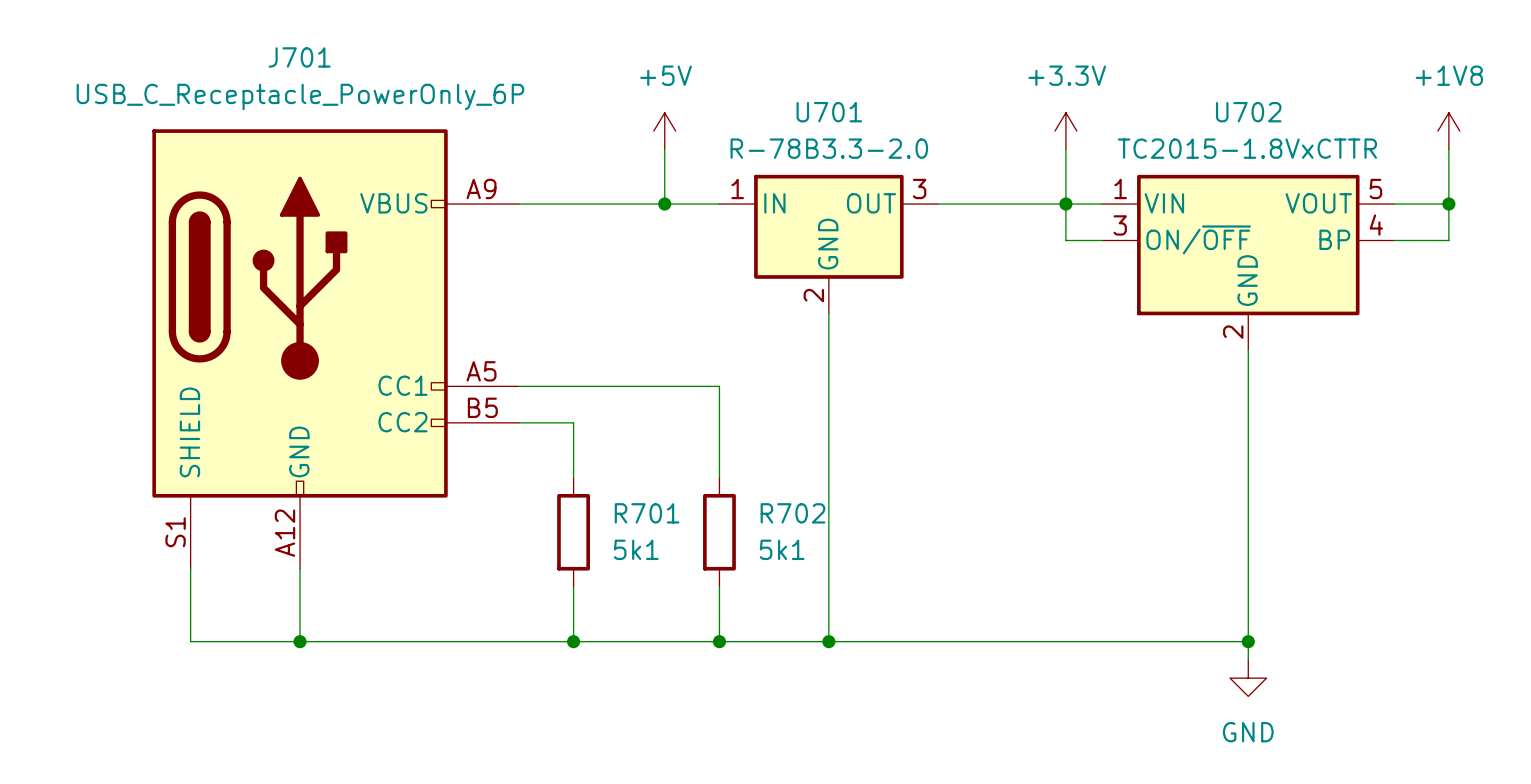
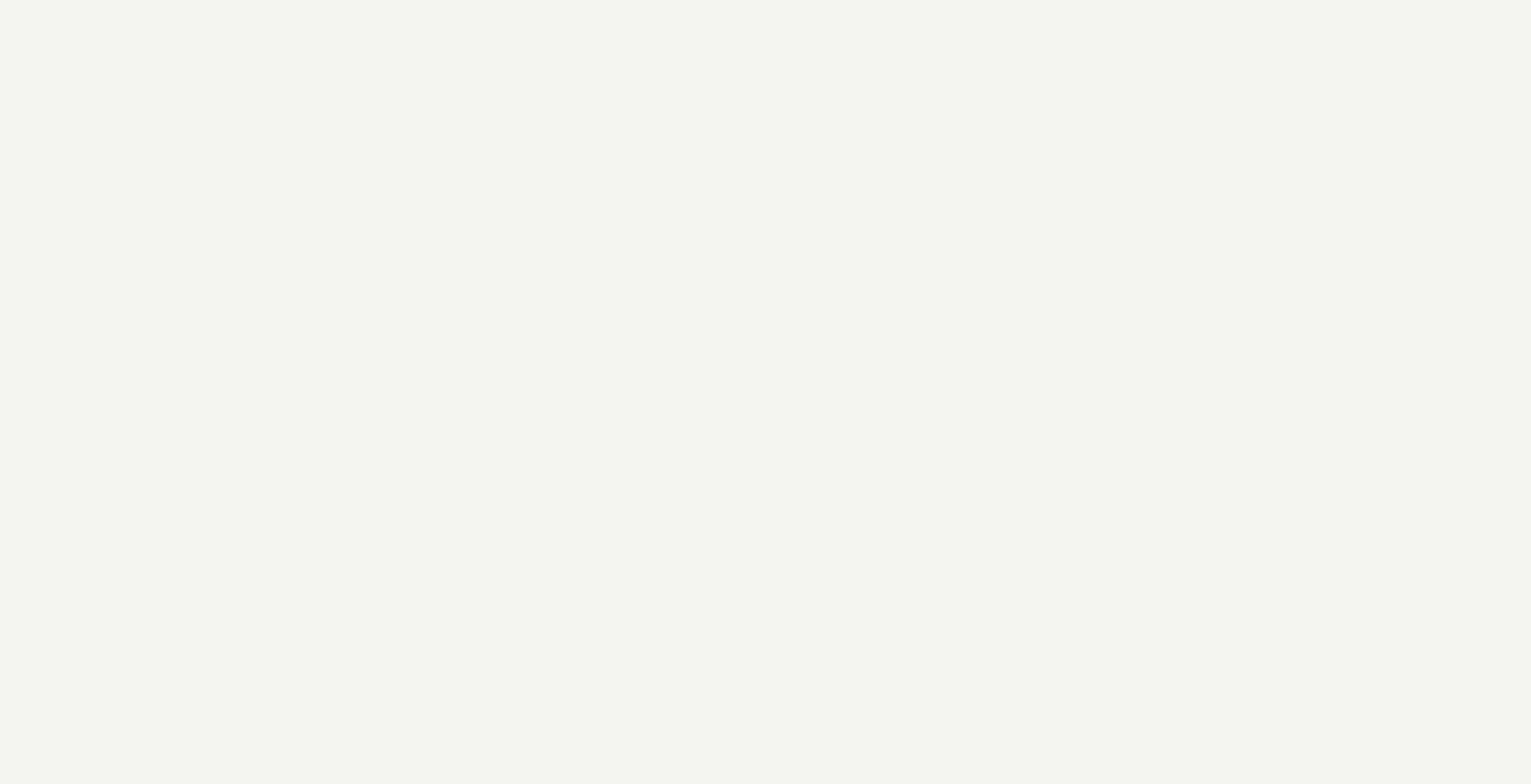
power symbol: +5V (664, 131) -> none
power symbol: +3.3V (1065, 131) -> none
power symbol: +1V8 (1448, 131) -> none
wire: (664, 149) (664, 204) -> none
wire: (1065, 149) (1065, 240) (1102, 240) -> none
wire: (1448, 149) (1448, 240) (1394, 240) -> none
wire: (518, 204) (719, 204) -> none
junction: (664, 204) -> none
wire: (938, 204) (1102, 204) -> none
junction: (1065, 204) -> none
wire: (1394, 204) (1448, 204) -> none
junction: (1448, 204) -> none
U701: R-78B3.3-2.0 (828, 244) -> none
U702: TC2015-1.8VxCTTR (1248, 262) -> none
wire: (828, 313) (828, 641) -> none
J701: USB_C_Receptacle_PowerOnly_6P (335, 349) -> none
wire: (1248, 349) (1248, 659) -> none
wire: (518, 386) (719, 386) (719, 477) -> none
wire: (518, 422) (573, 422) (573, 477) -> none
R701: 5k1 (573, 532) -> none
R702: 5k1 (719, 532) -> none
wire: (190, 568) (190, 641) (1248, 641) -> none
wire: (300, 568) (300, 641) -> none
wire: (573, 586) (573, 641) -> none
wire: (719, 586) (719, 641) -> none
junction: (300, 641) -> none
junction: (573, 641) -> none
junction: (719, 641) -> none
junction: (828, 641) -> none
junction: (1248, 641) -> none
power symbol: GND (1248, 678) -> none

